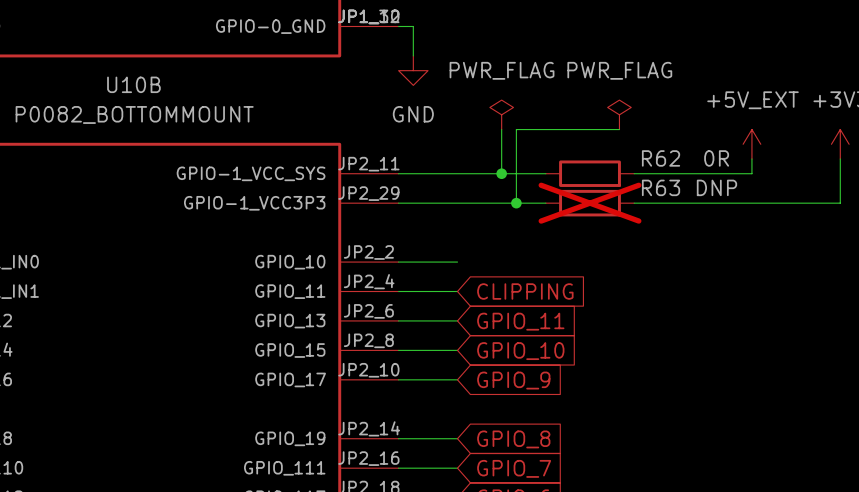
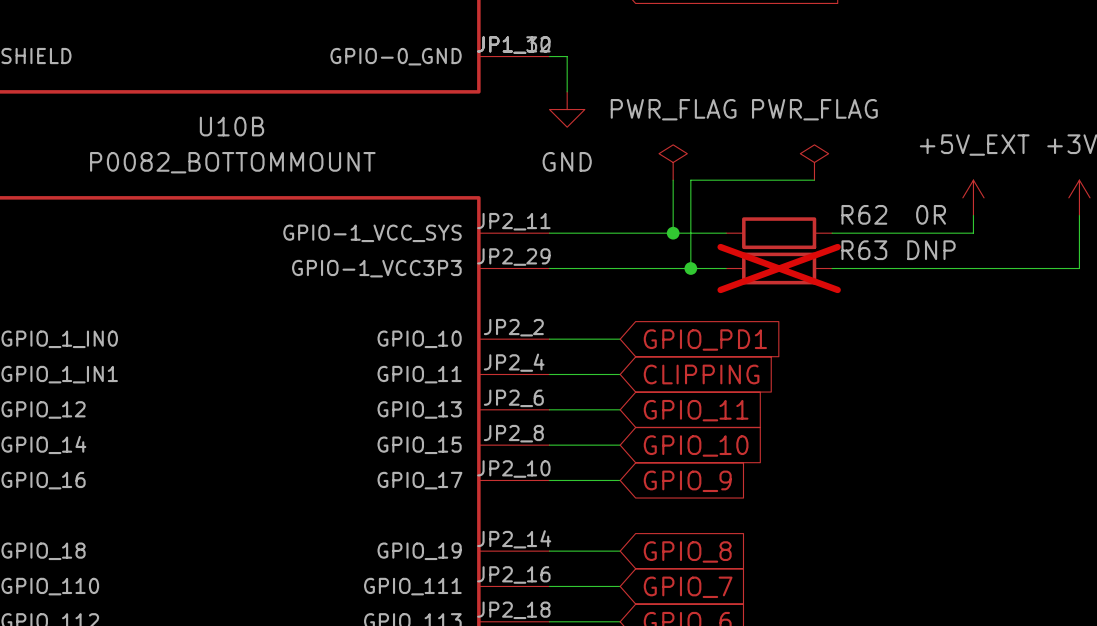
global label: none -> GPIO_PD1 (705, 340)

